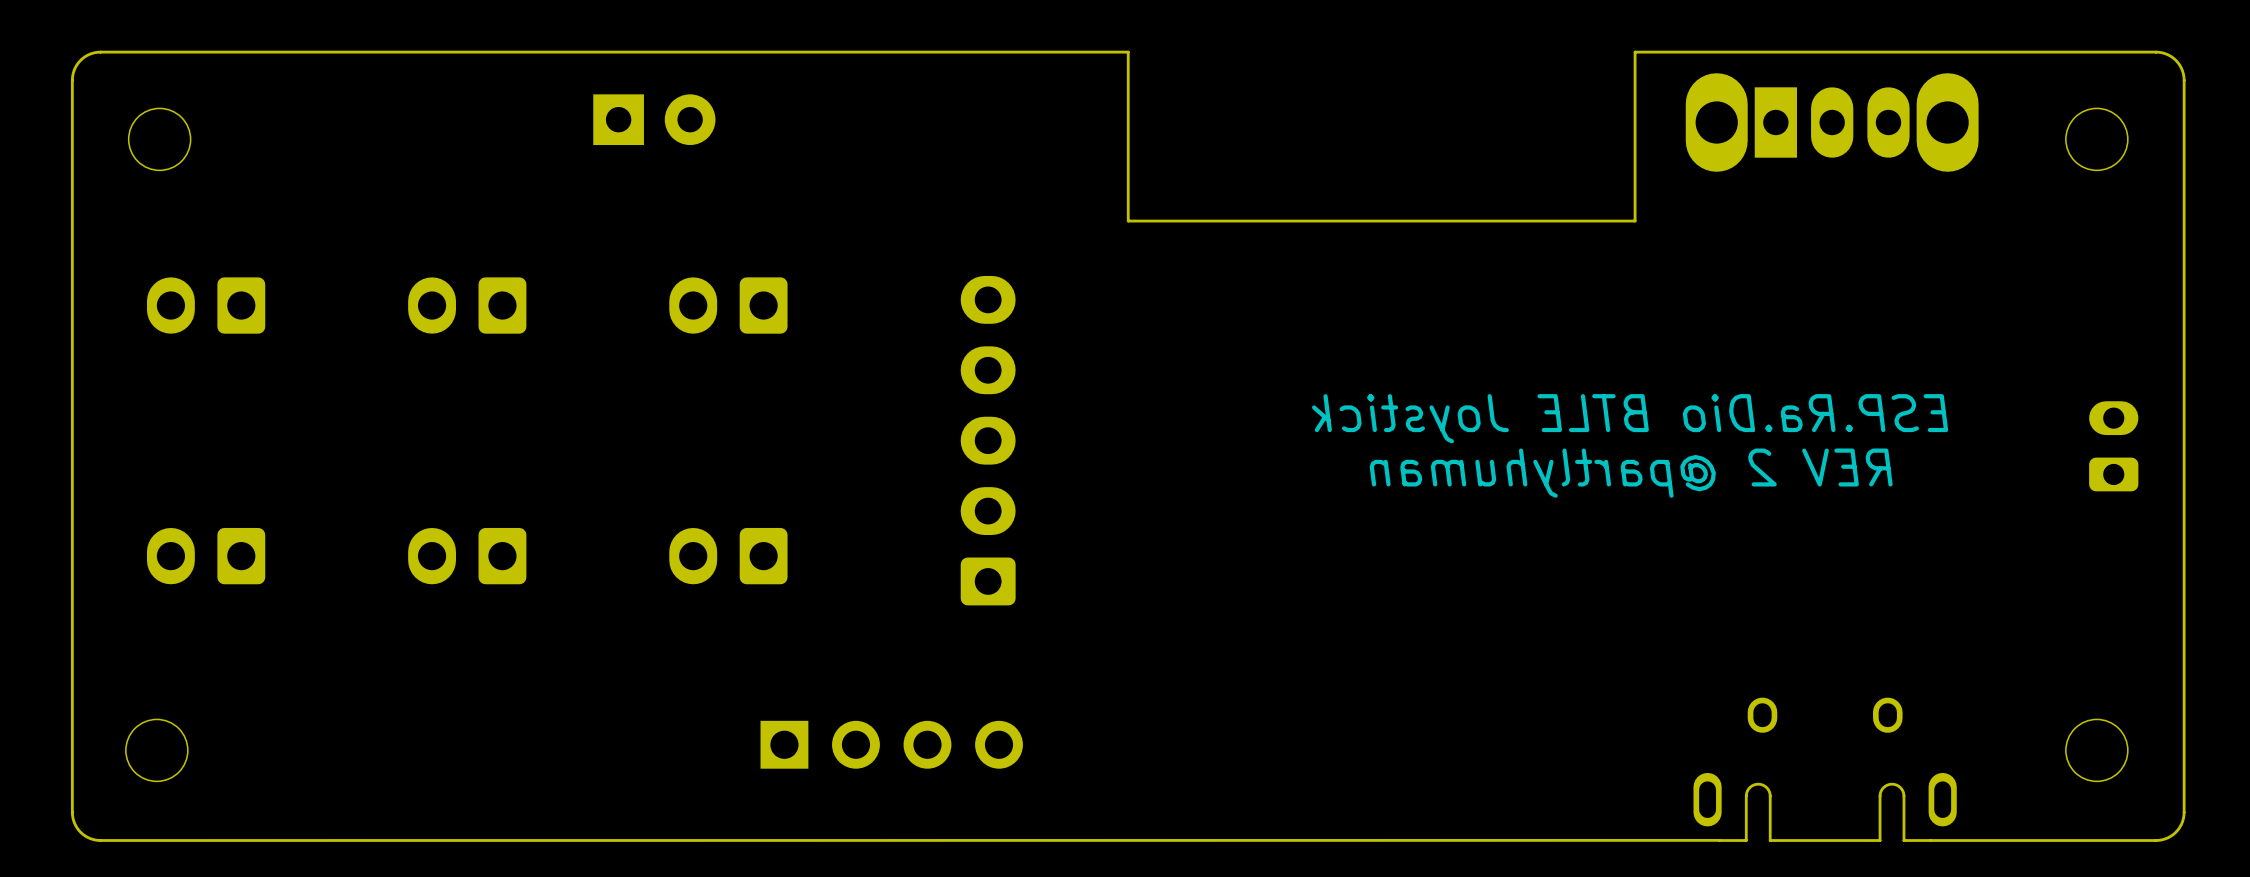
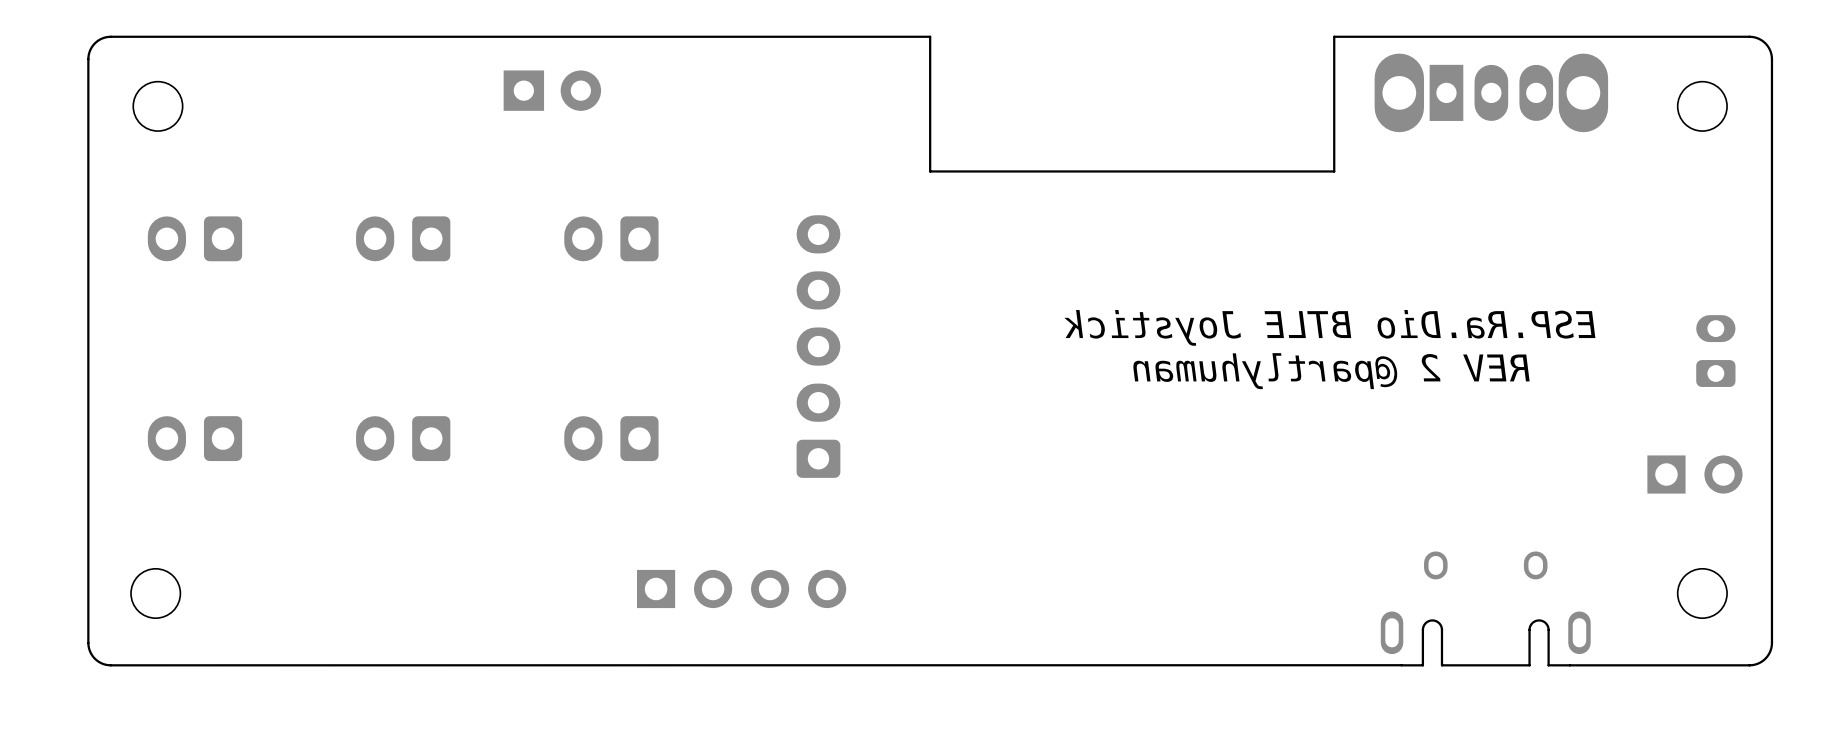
part: none -> (1694, 474)

